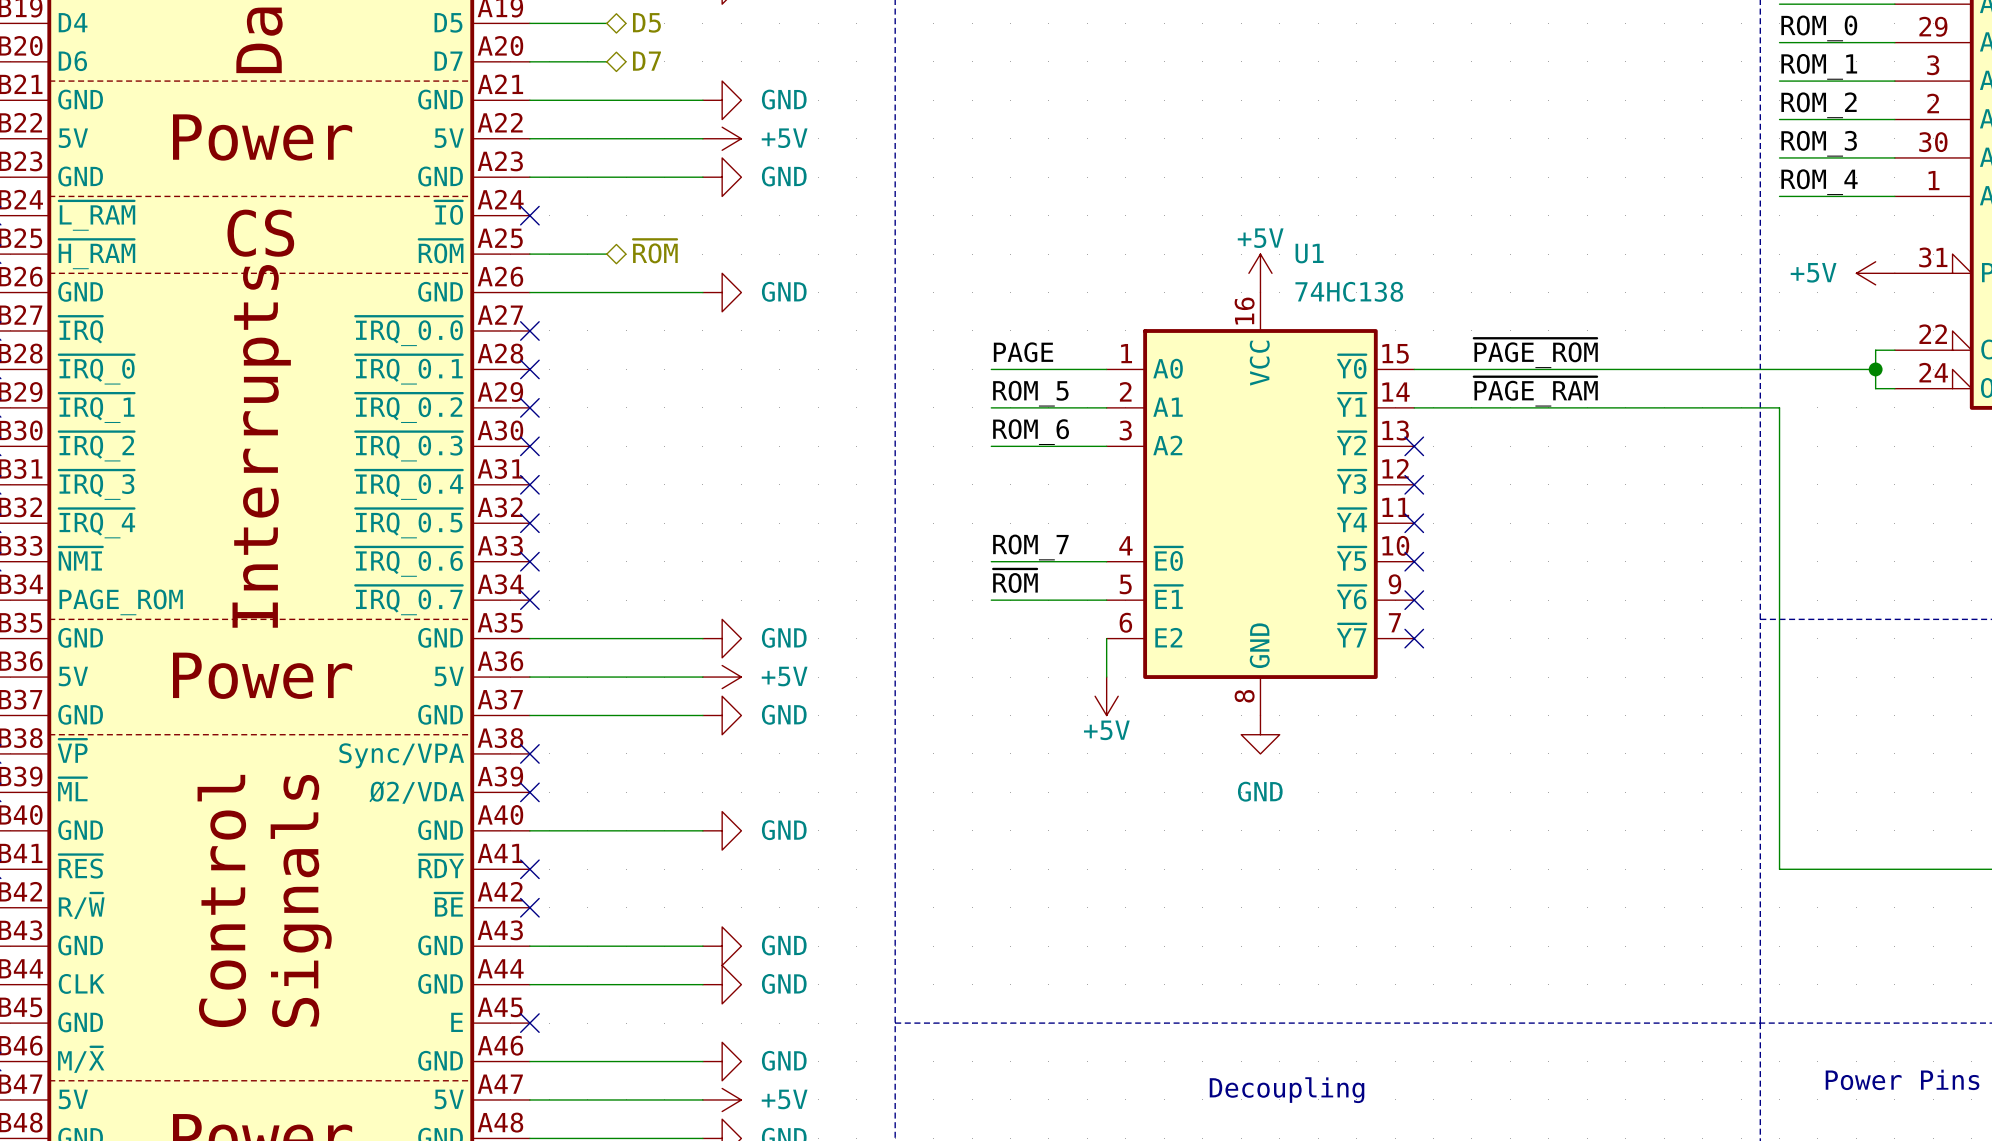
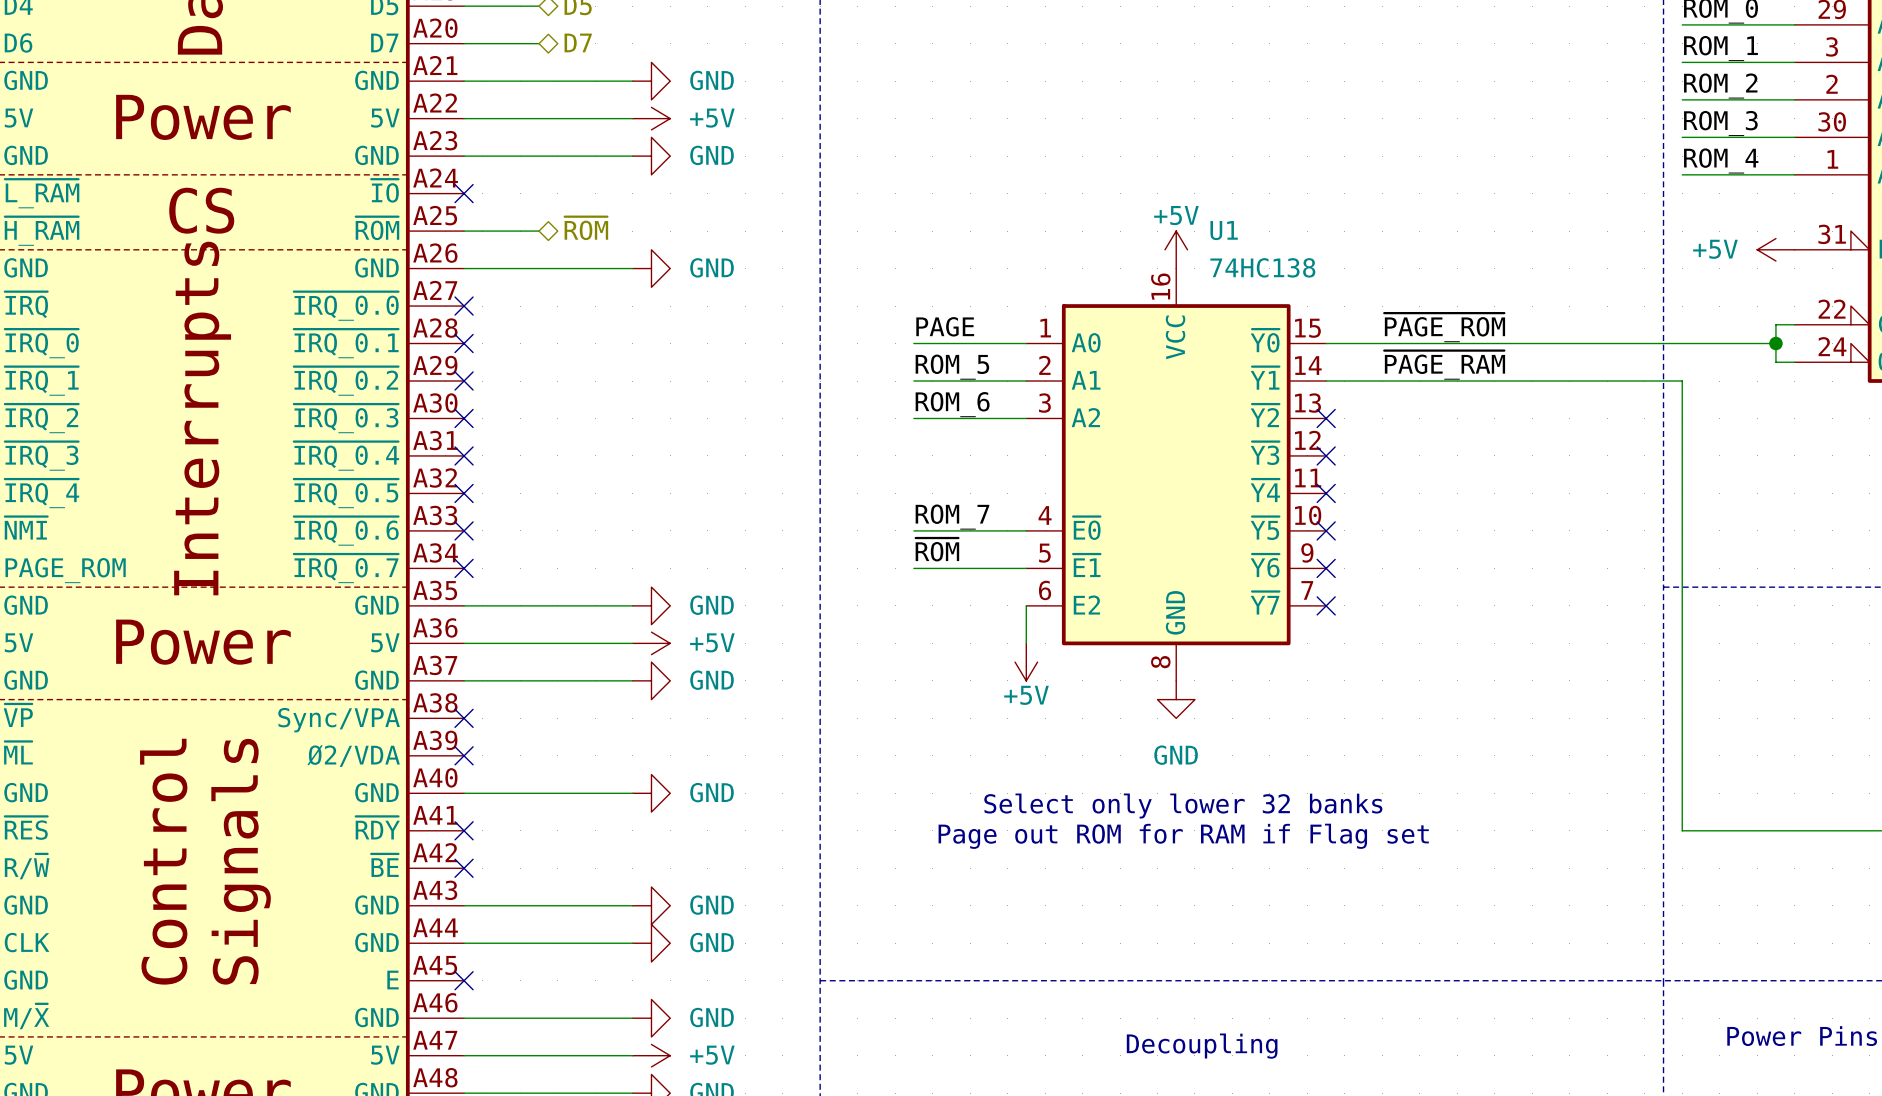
text: none -> Select only lower 32 banks (1183, 806)
text: none -> Page out ROM for RAM if Flag set (1183, 836)

